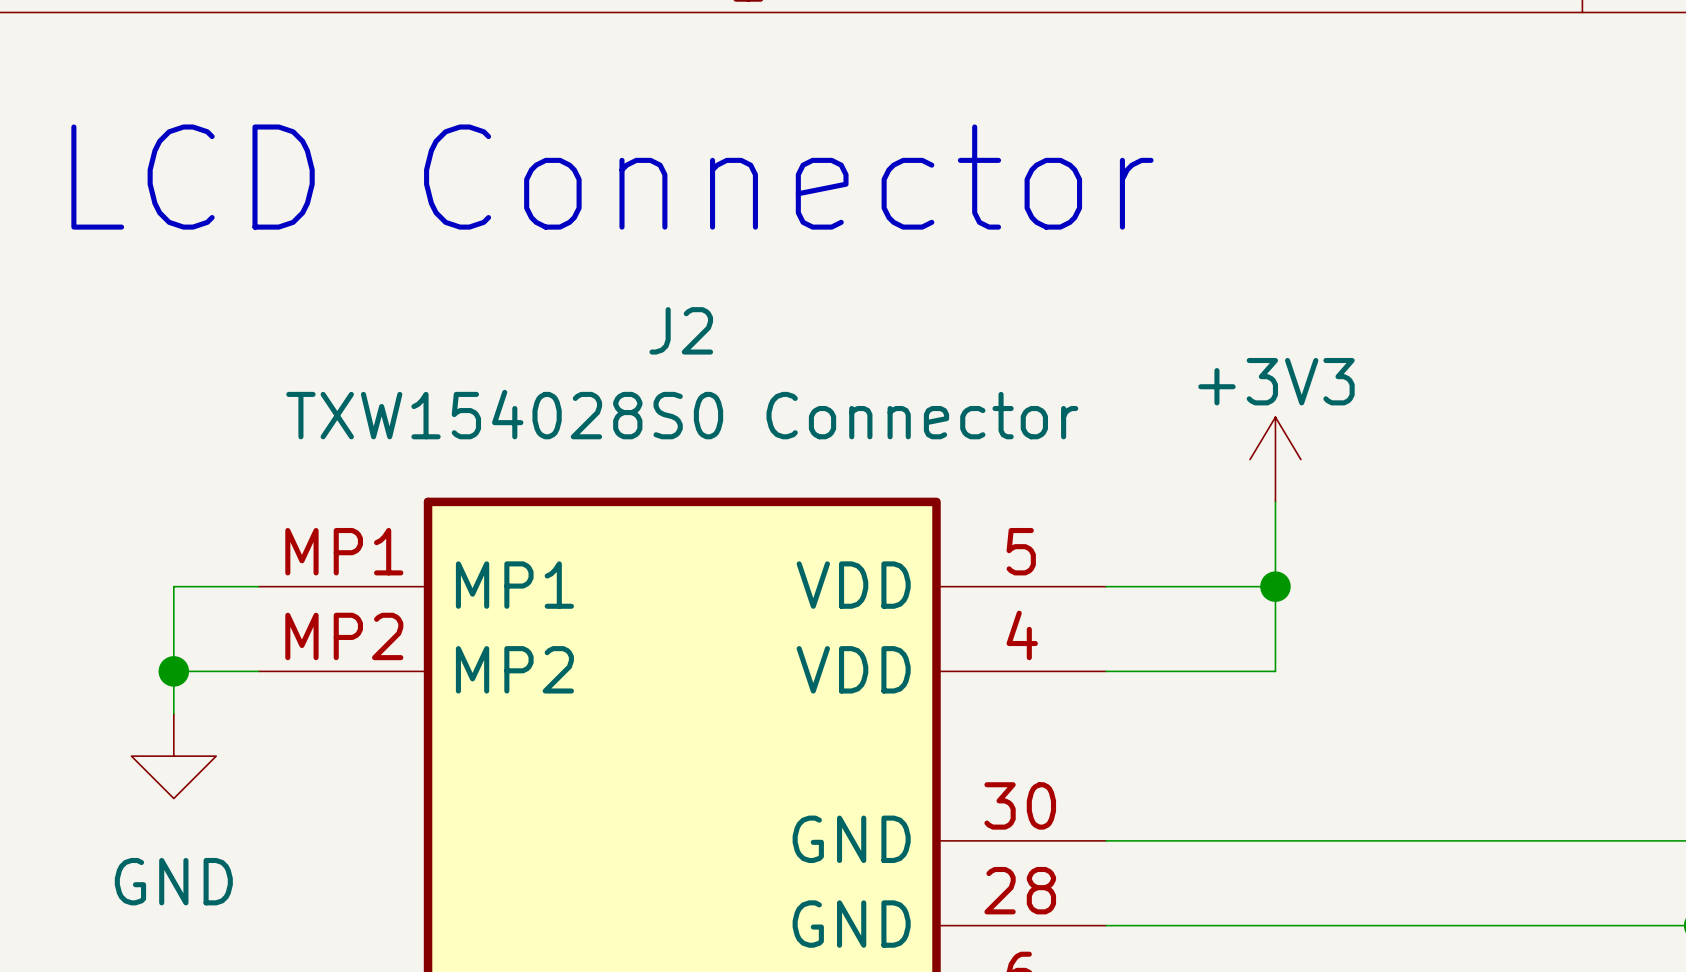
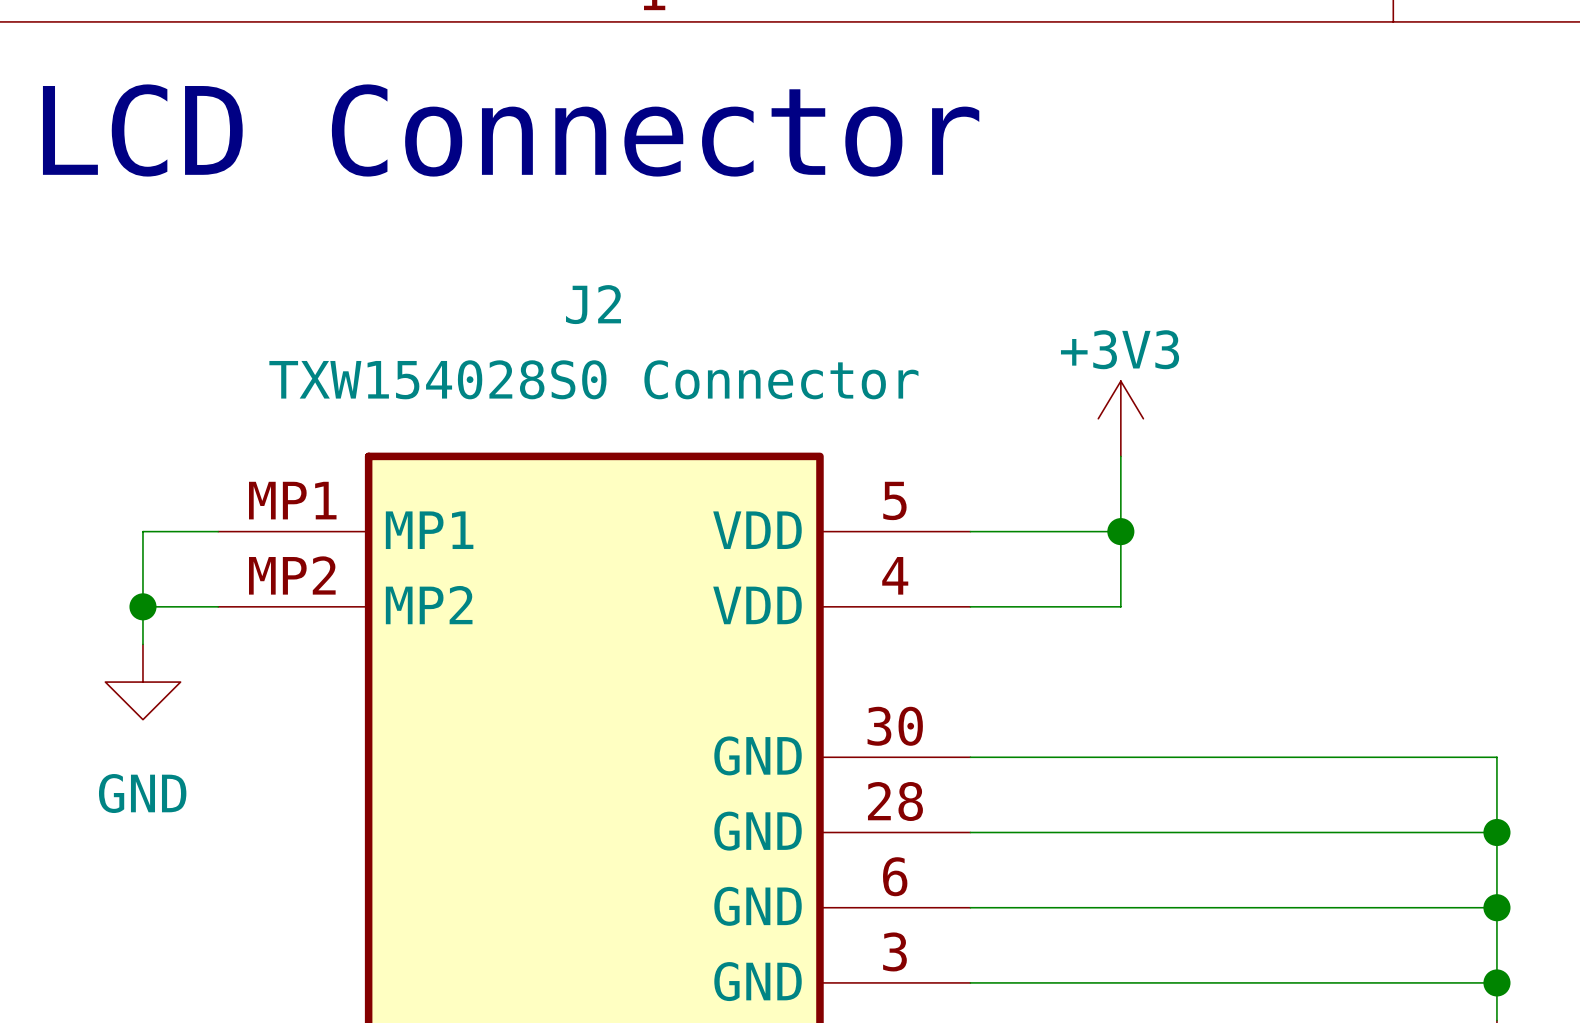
text position: LCD Connector (612, 177) -> LCD Connector (511, 130)

